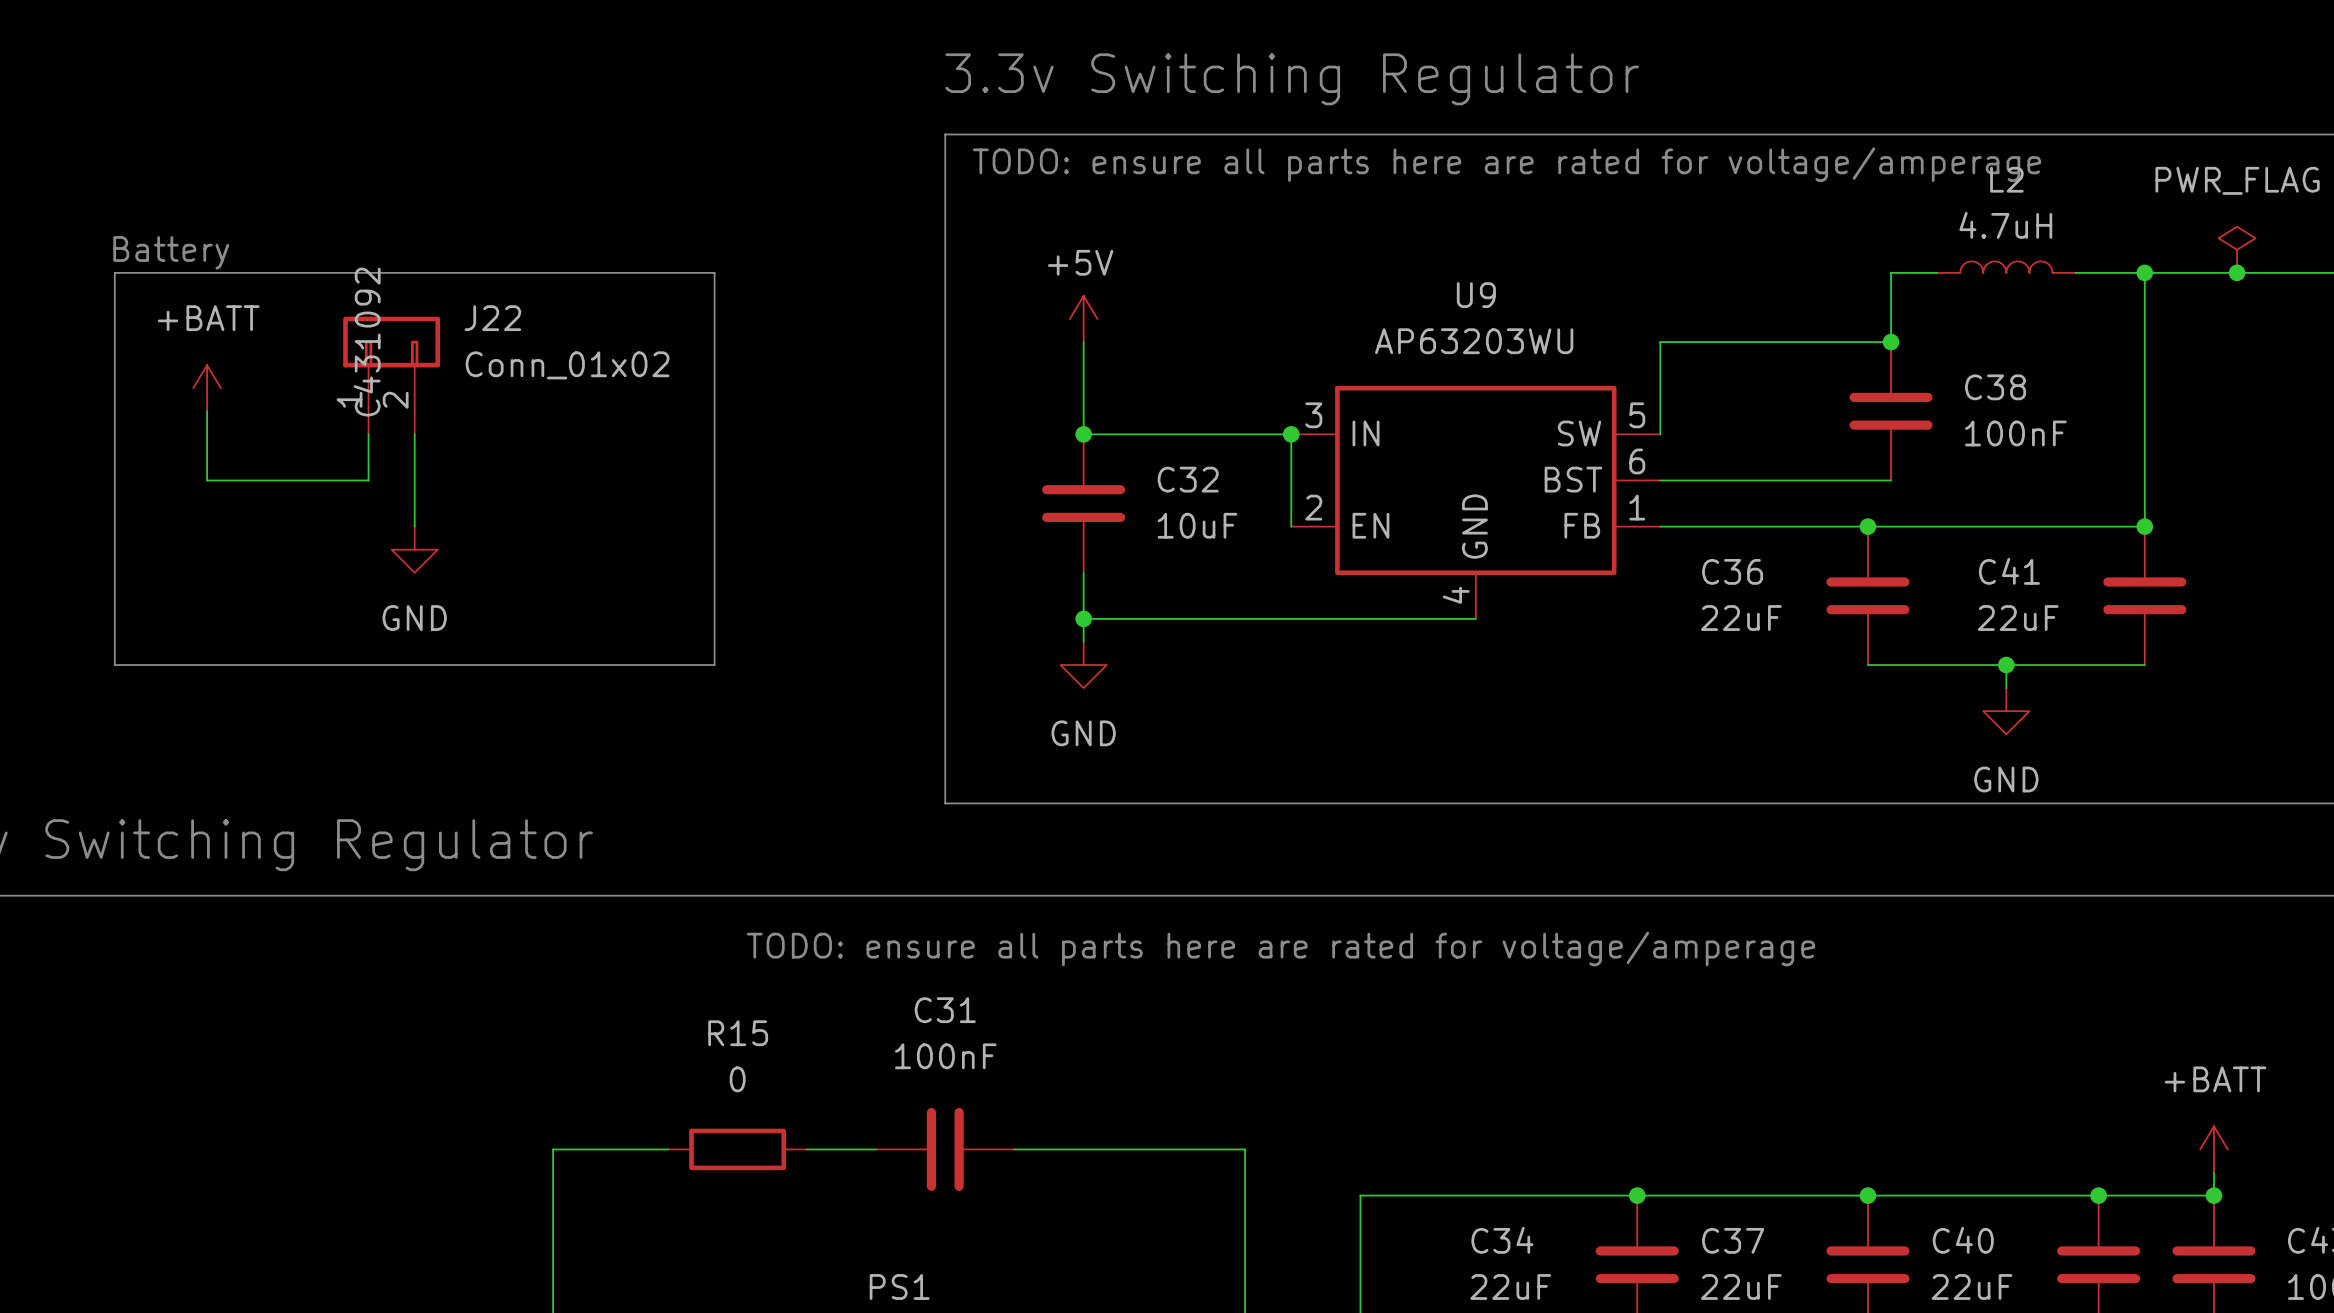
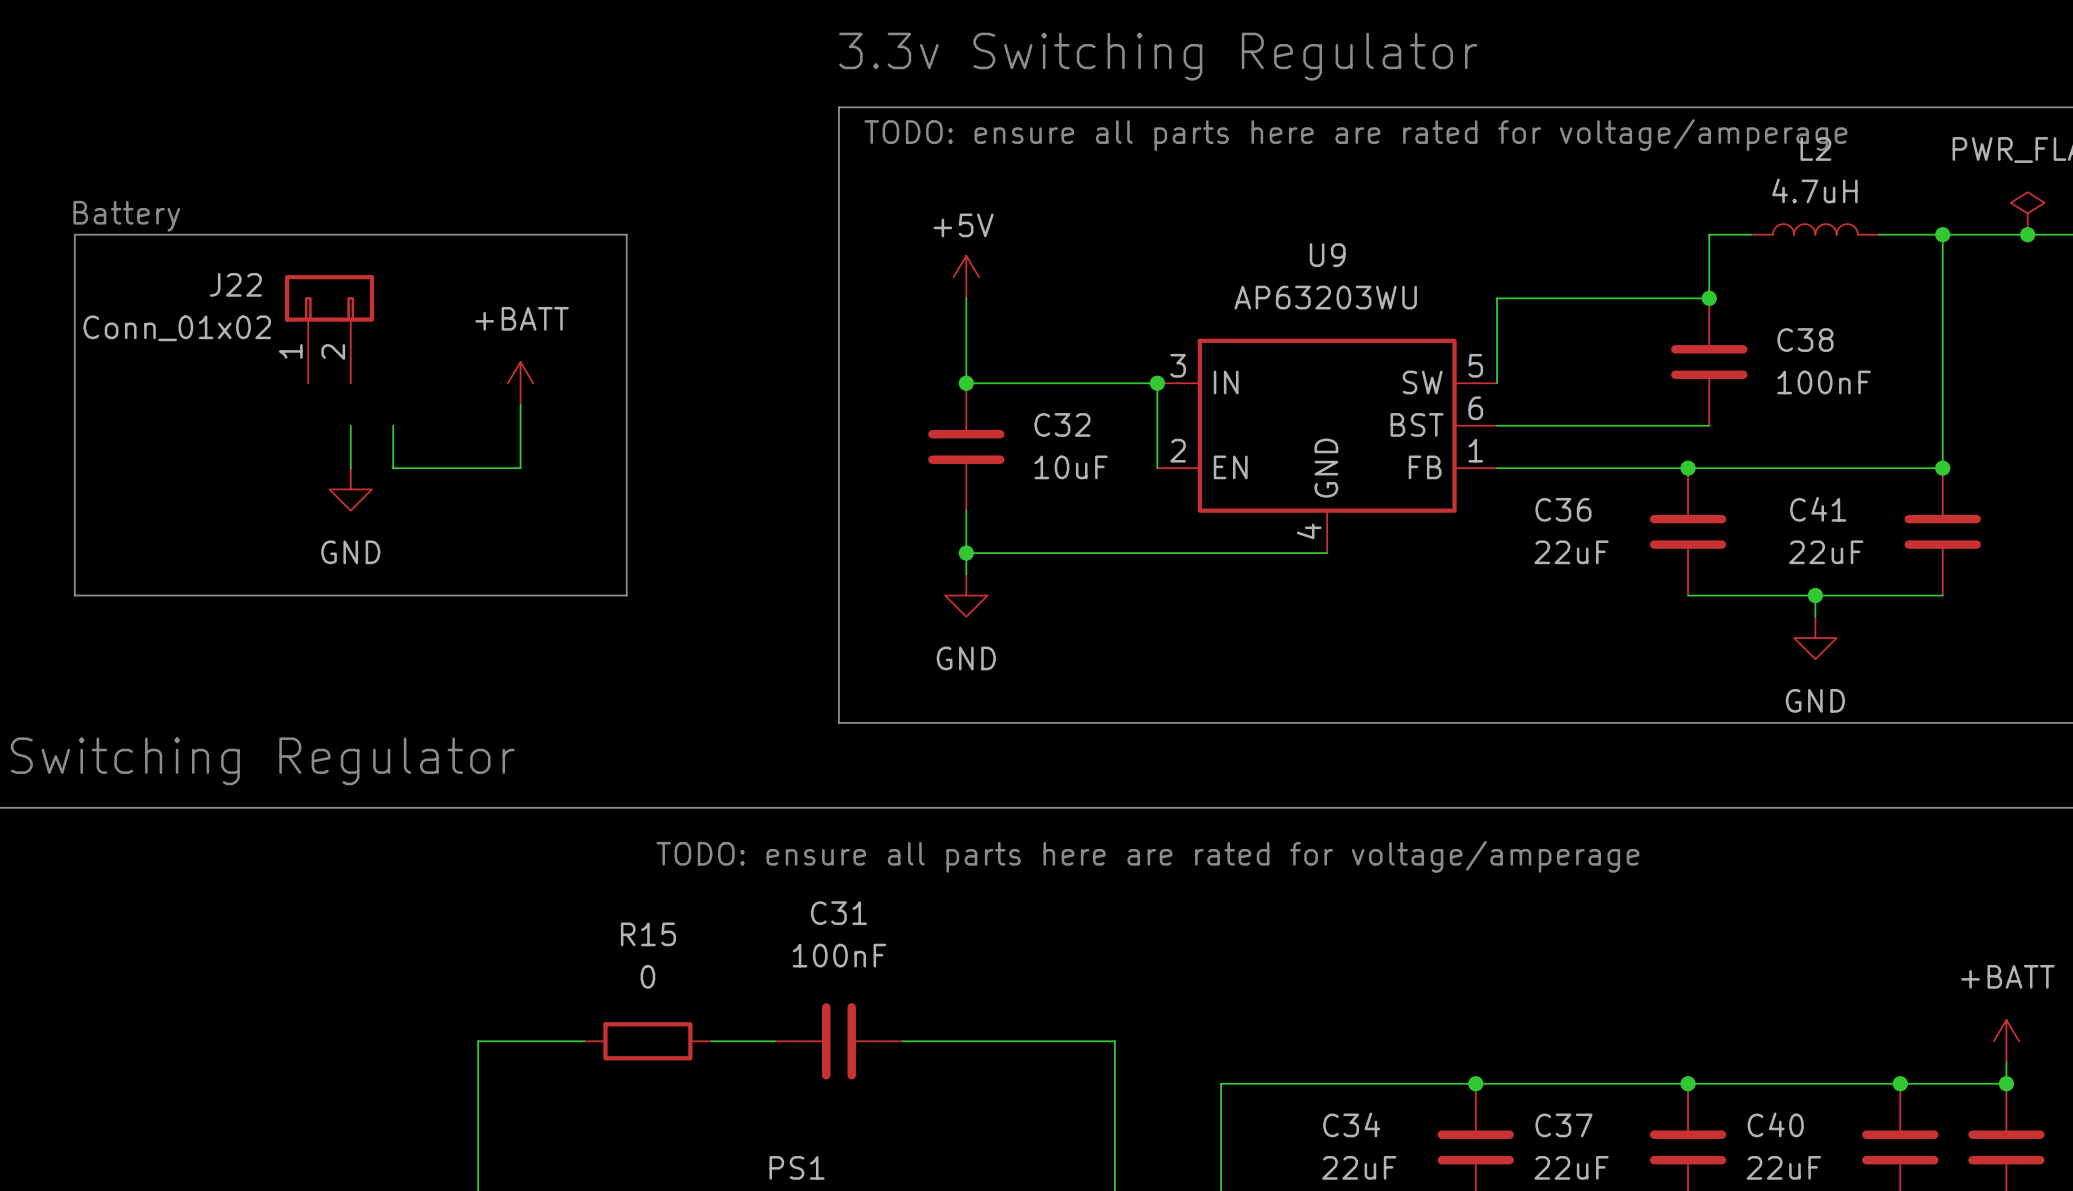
J22 name position: J22 (492, 318) -> J22 (235, 284)
J22 text: C431092 (367, 342) -> none
J22 value position: Conn_01x02 (567, 365) -> Conn_01x02 (177, 328)
power symbol position: +BATT (207, 388) -> +BATT (520, 383)
wire: (207, 411) (207, 480) (368, 480) (368, 434) -> none
wire: (414, 434) (414, 480) -> none
wire: none -> (520, 404) (520, 468) (393, 468) (393, 425)

